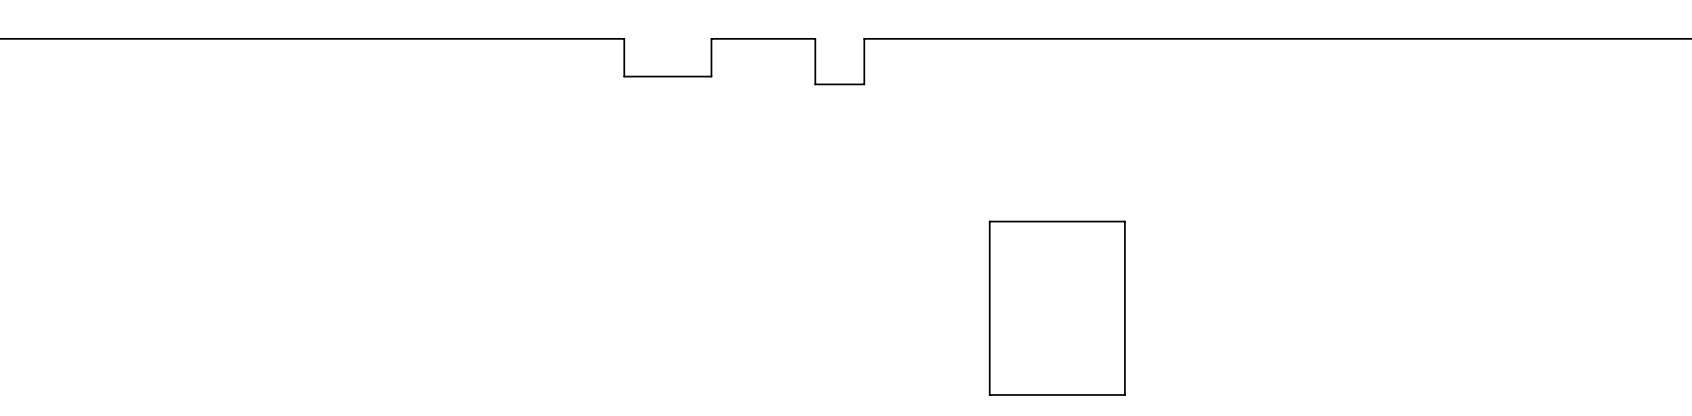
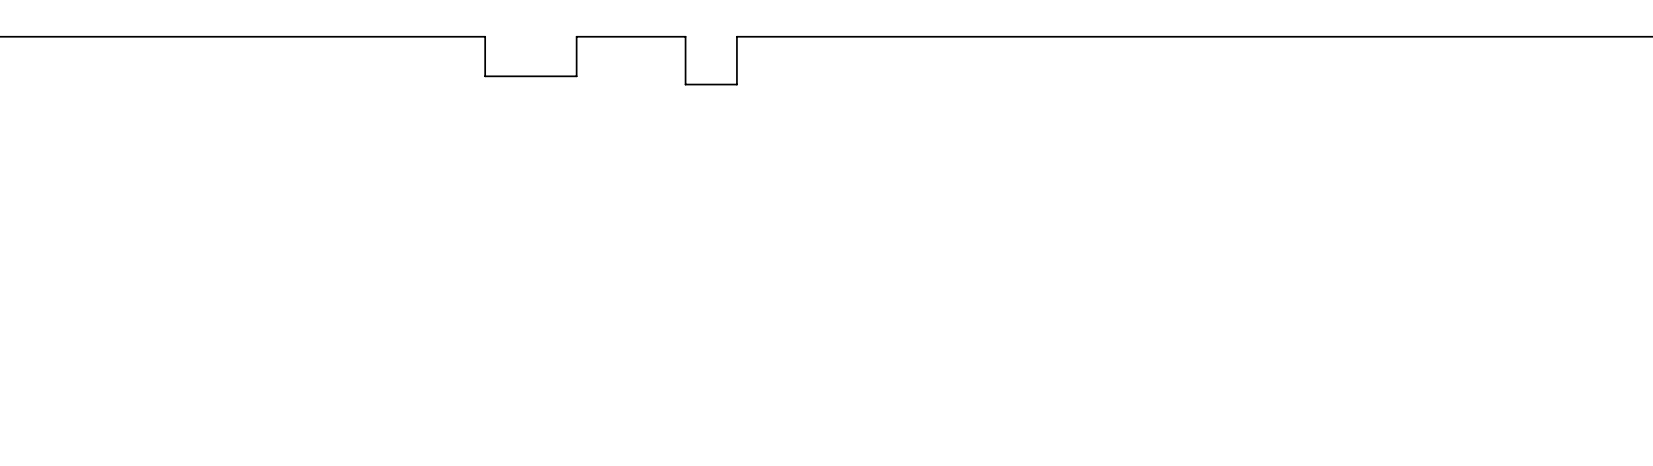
board edge: (989, 221) (989, 394) (1124, 394) (1124, 221) (989, 221) -> none

